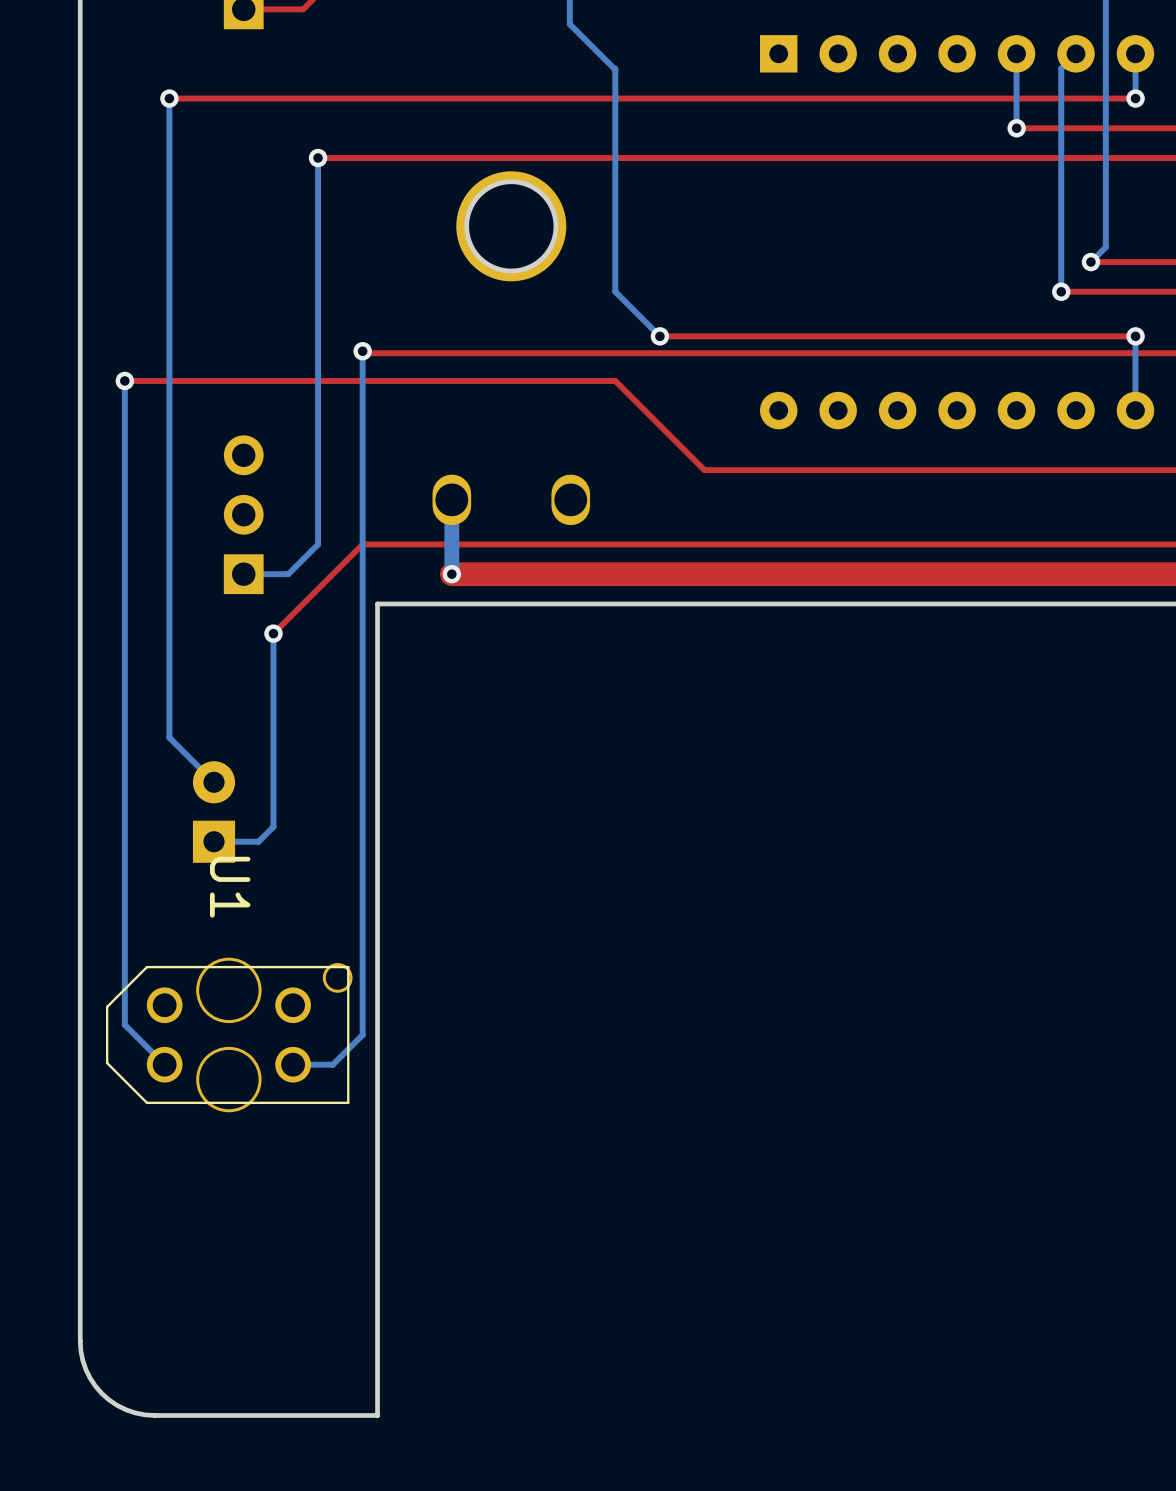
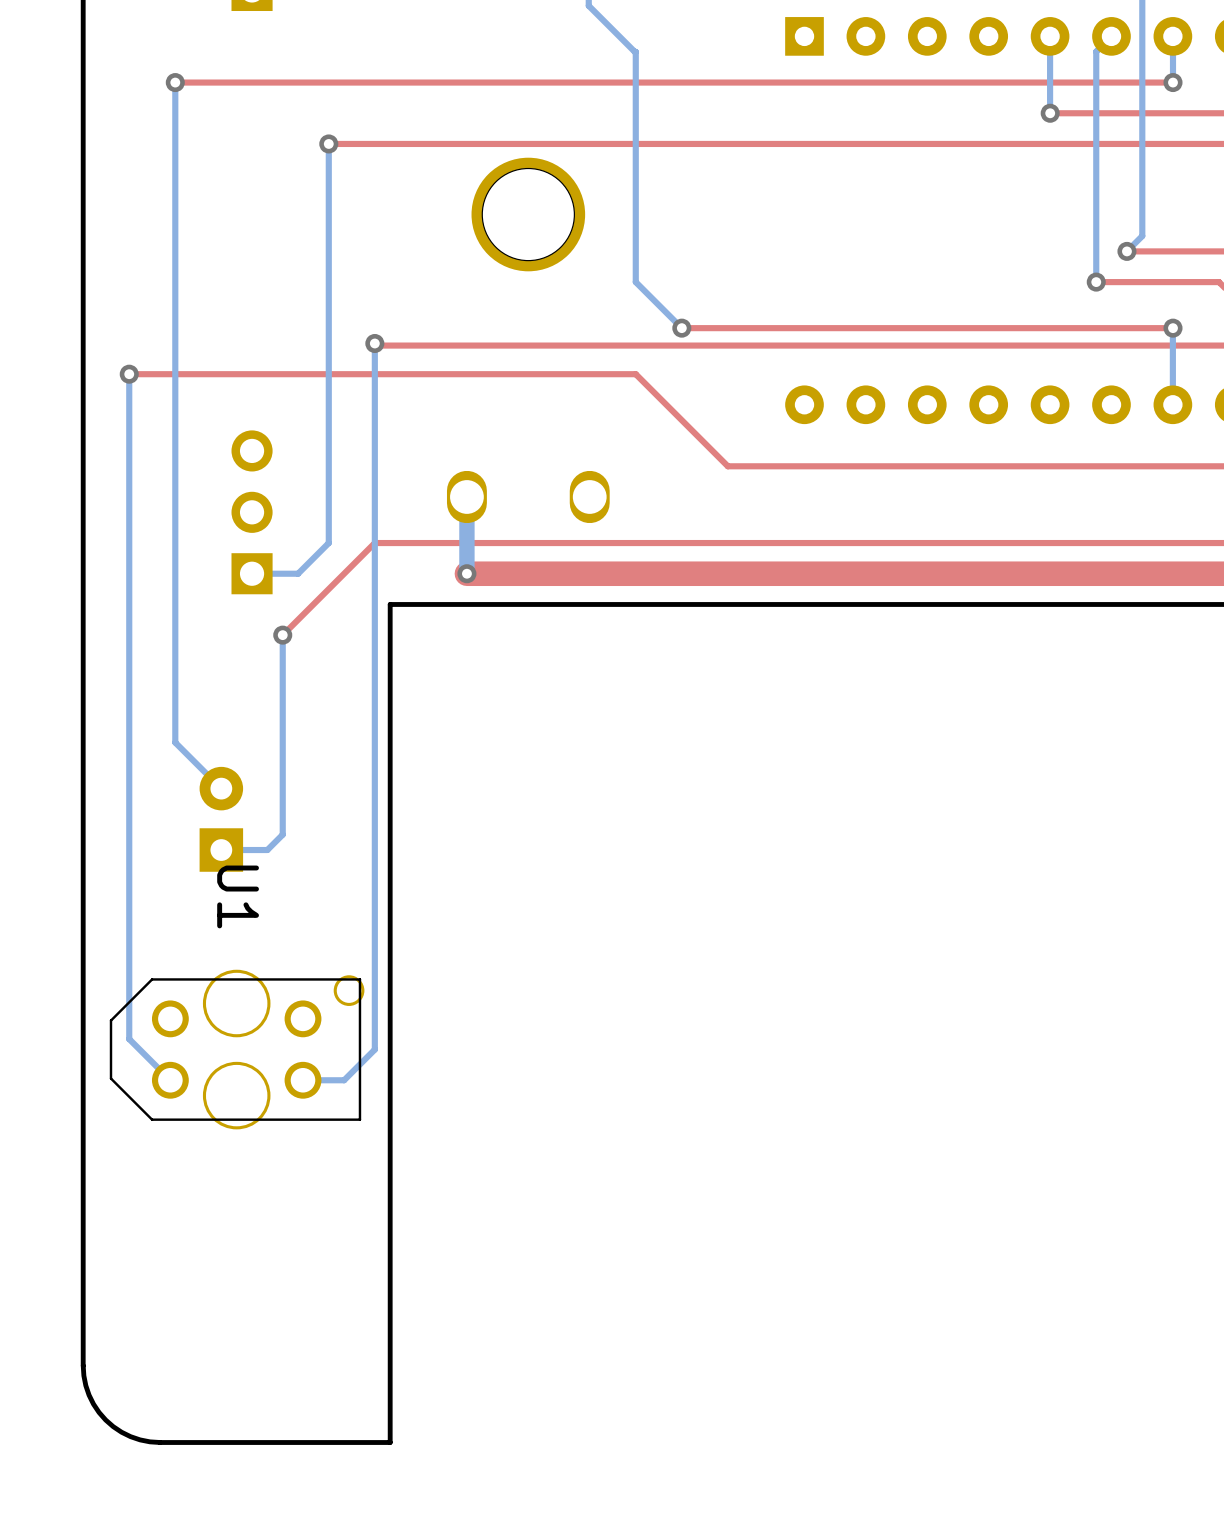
round board edge: [464, 179, 559, 274] -> none

